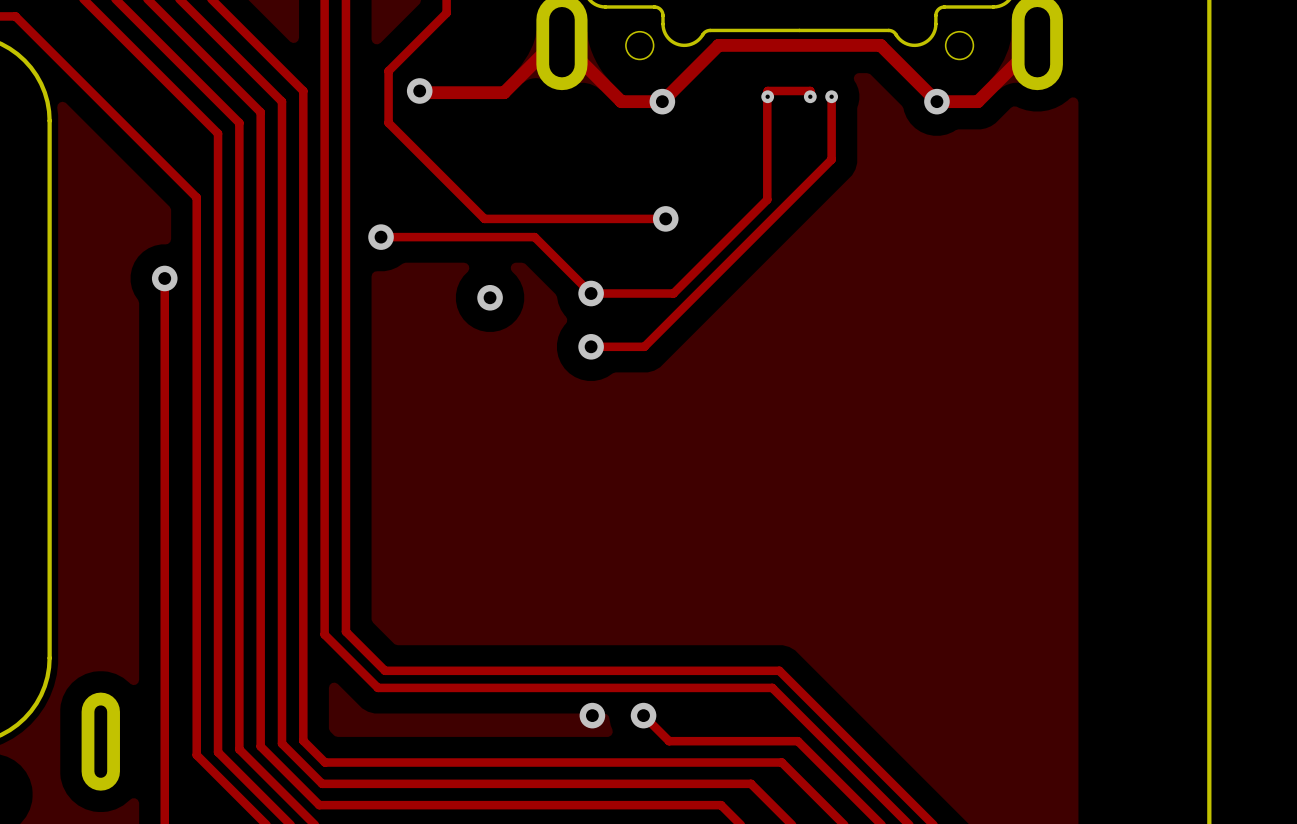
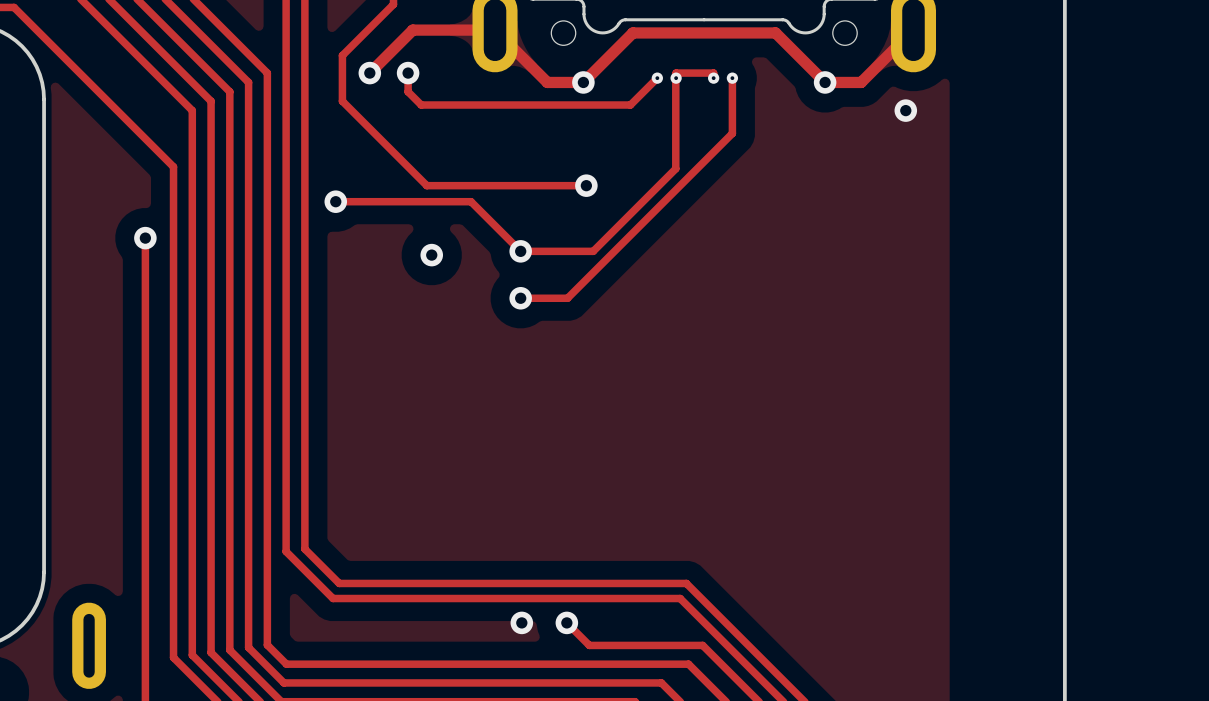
track: (554, 42) (504, 92) (421, 92) (419, 90) -> (488, 30) (412, 30) (369, 73)
track: none -> (408, 73) (408, 91) (421, 105) (630, 105) (657, 78)
via: none -> (408, 73)
via: none -> (657, 78)
via: none -> (905, 110)

